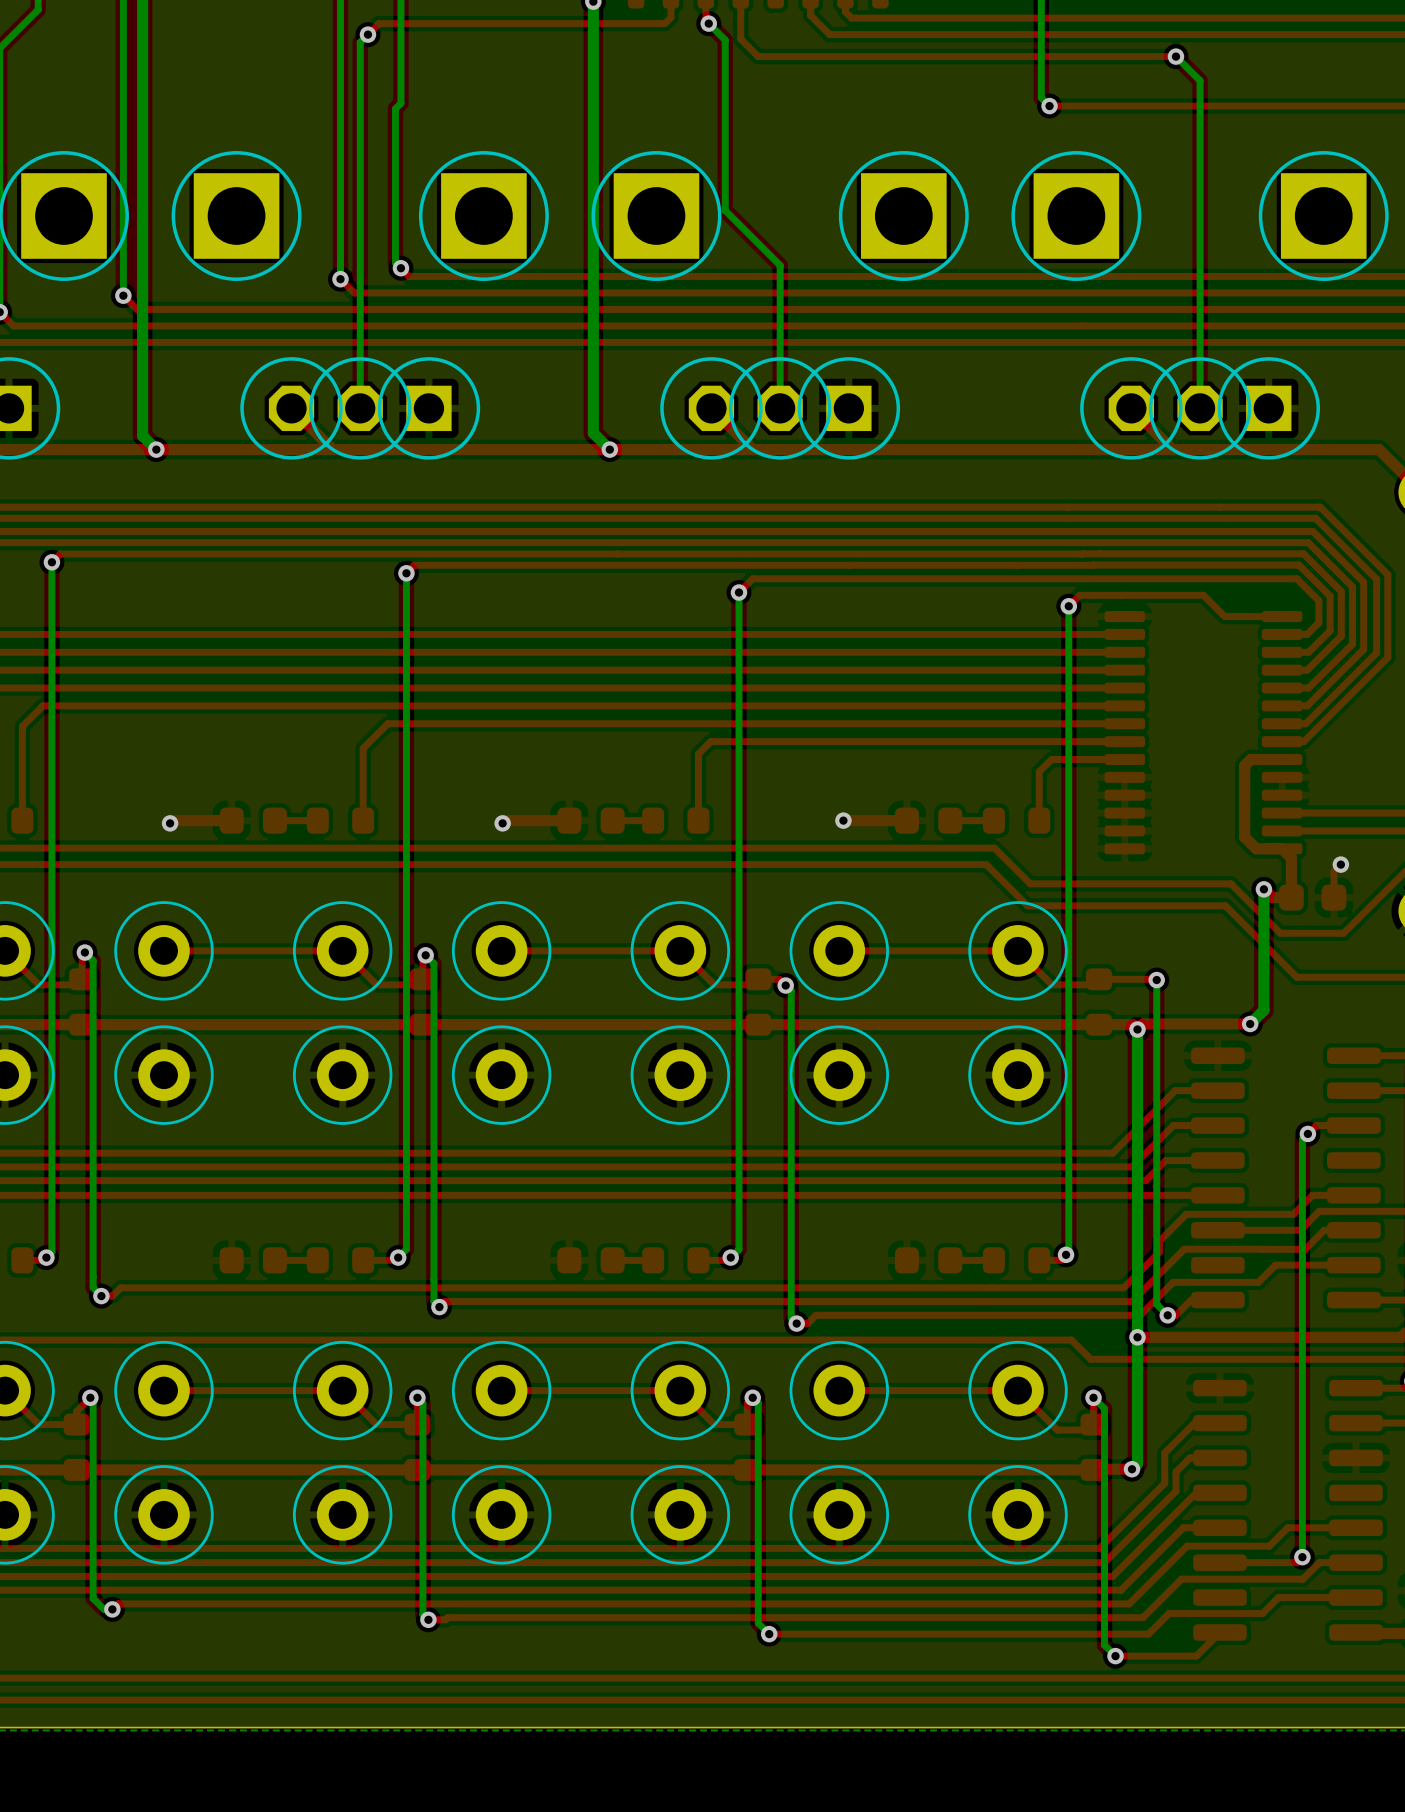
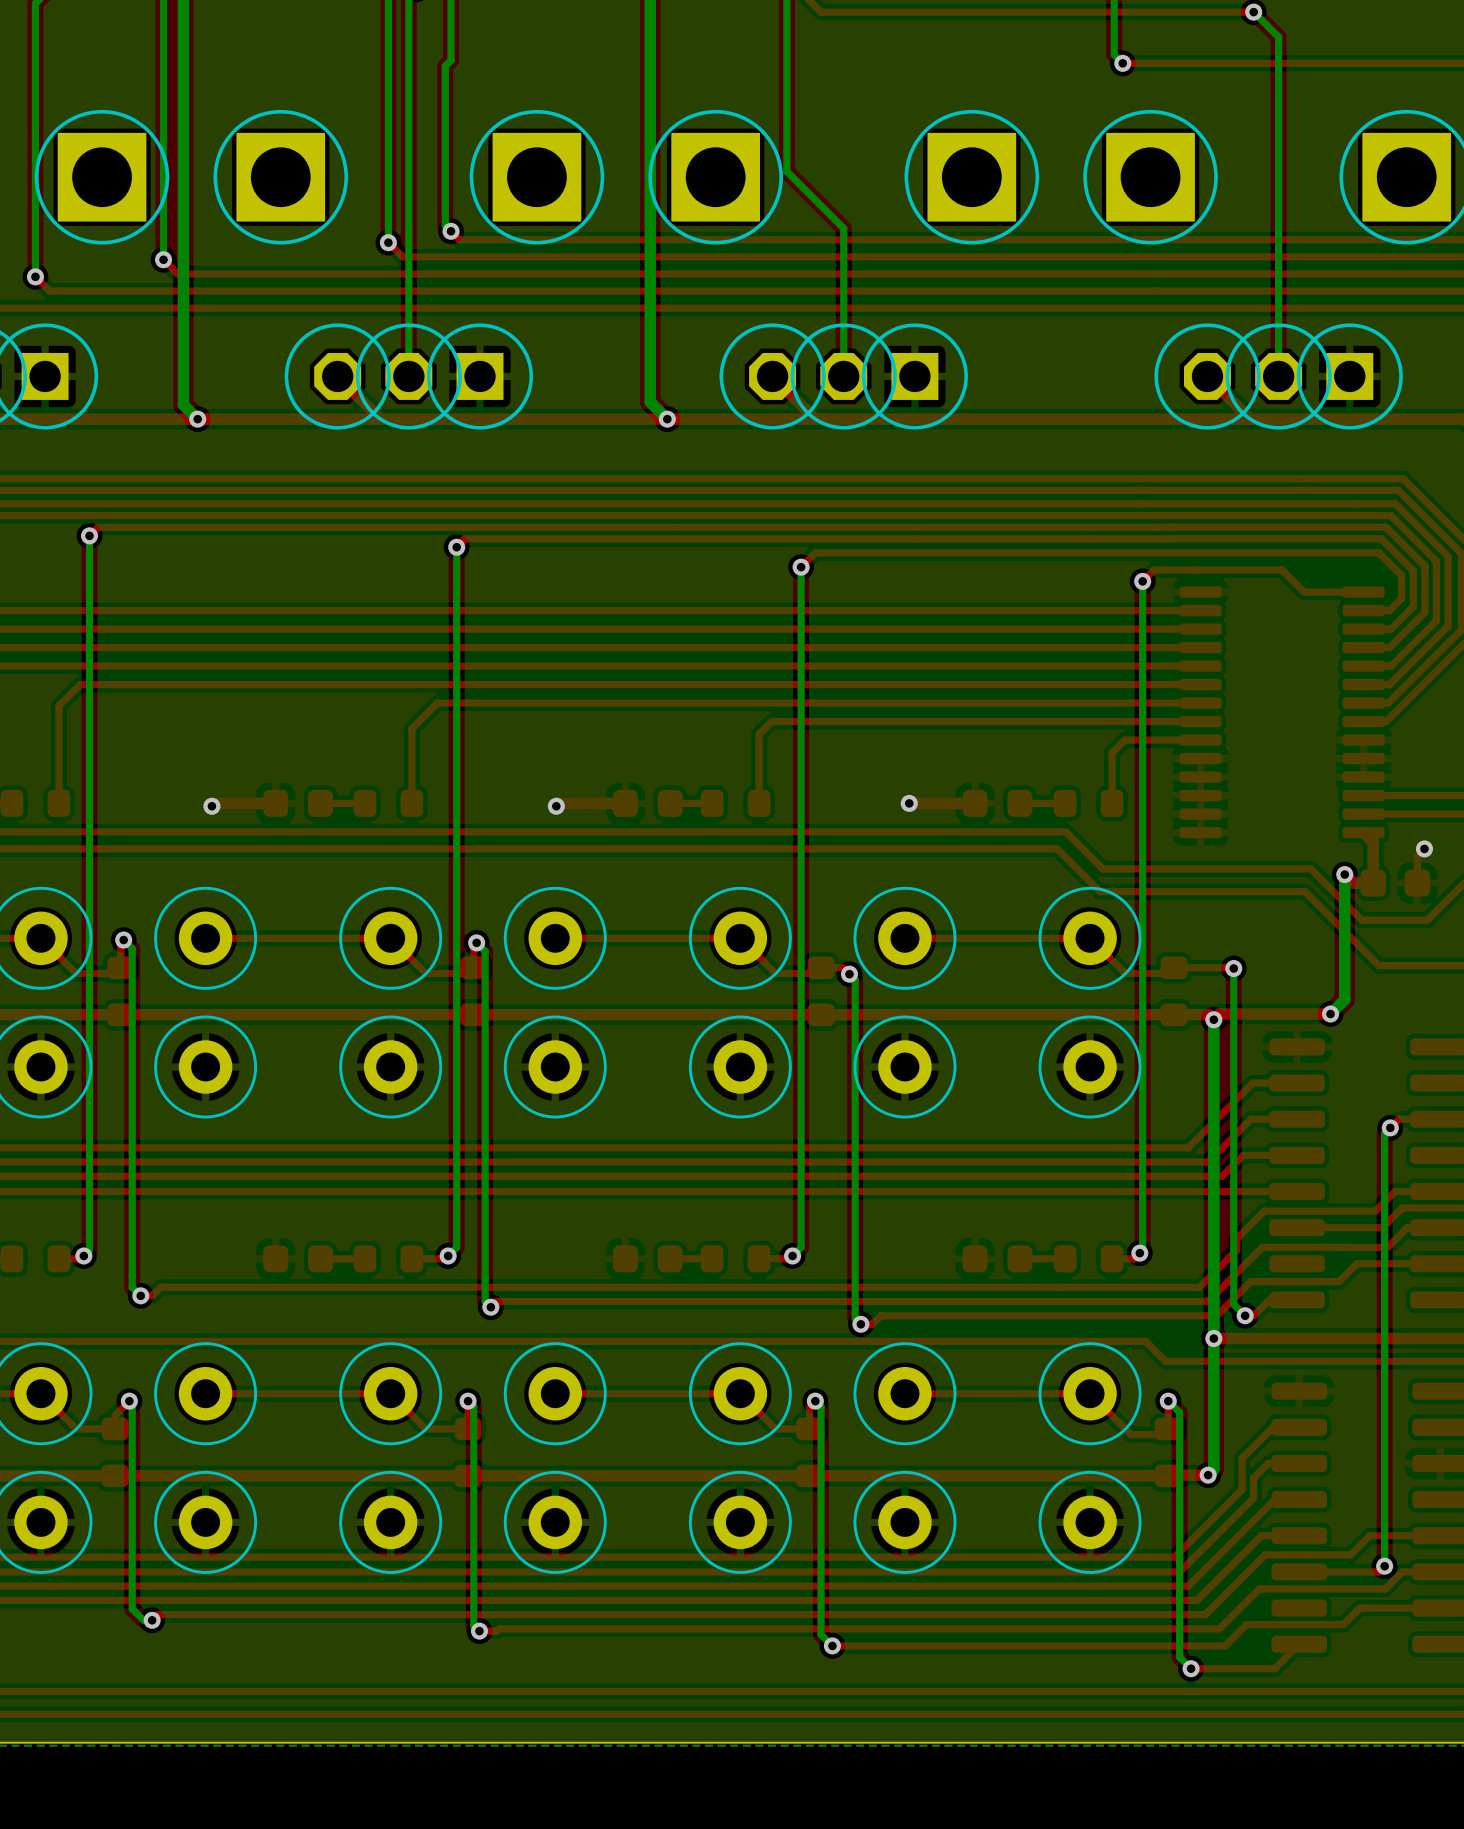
top track: (1282, 759) (1250, 759) (1244, 765) (1244, 837) (1256, 848) (1282, 848) -> none

